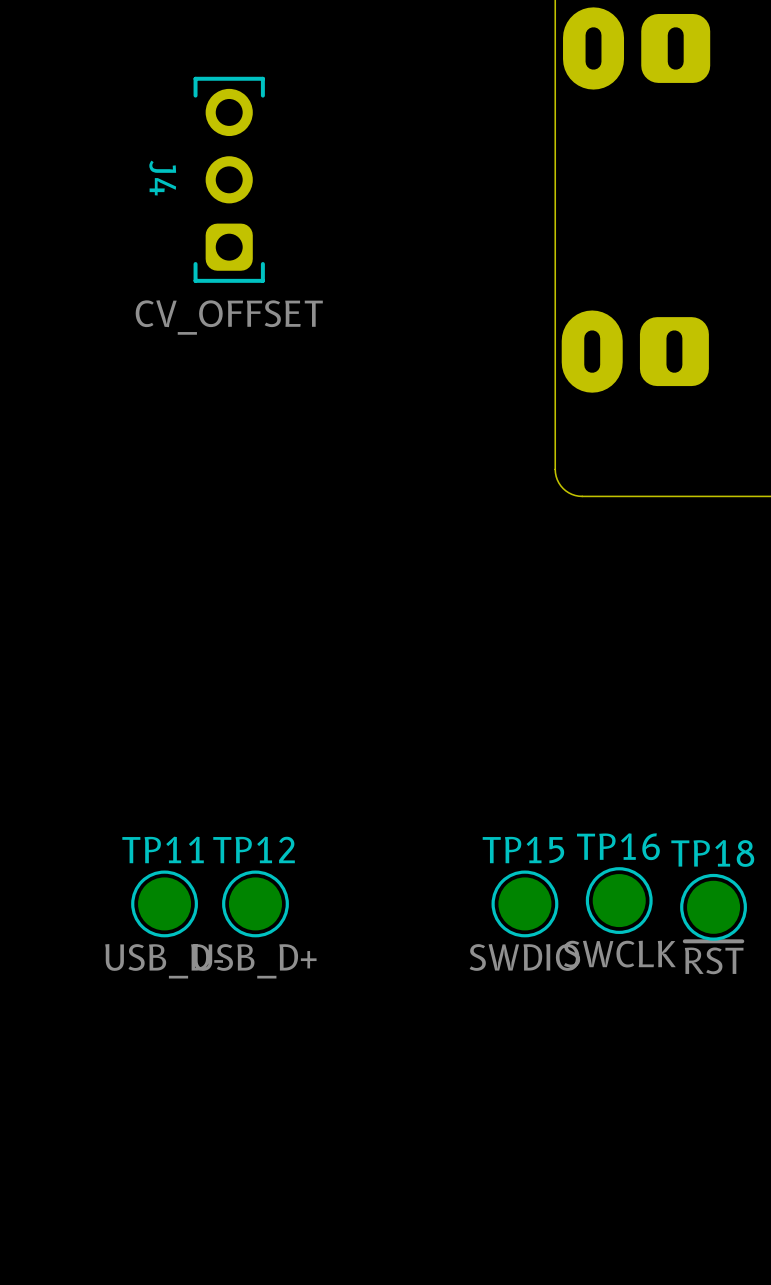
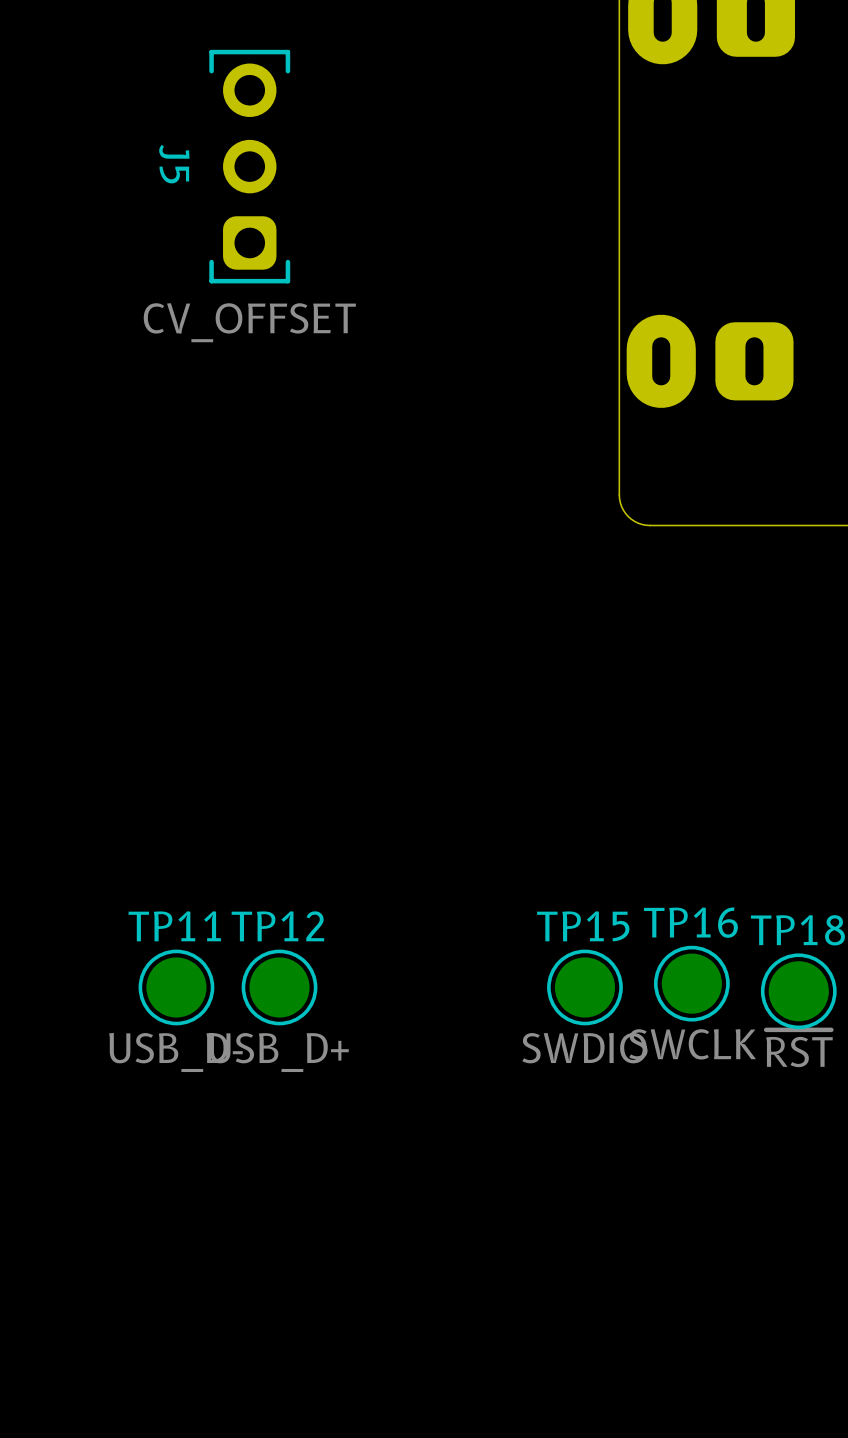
J4 name: J4 (162, 178) -> J5 (174, 164)

